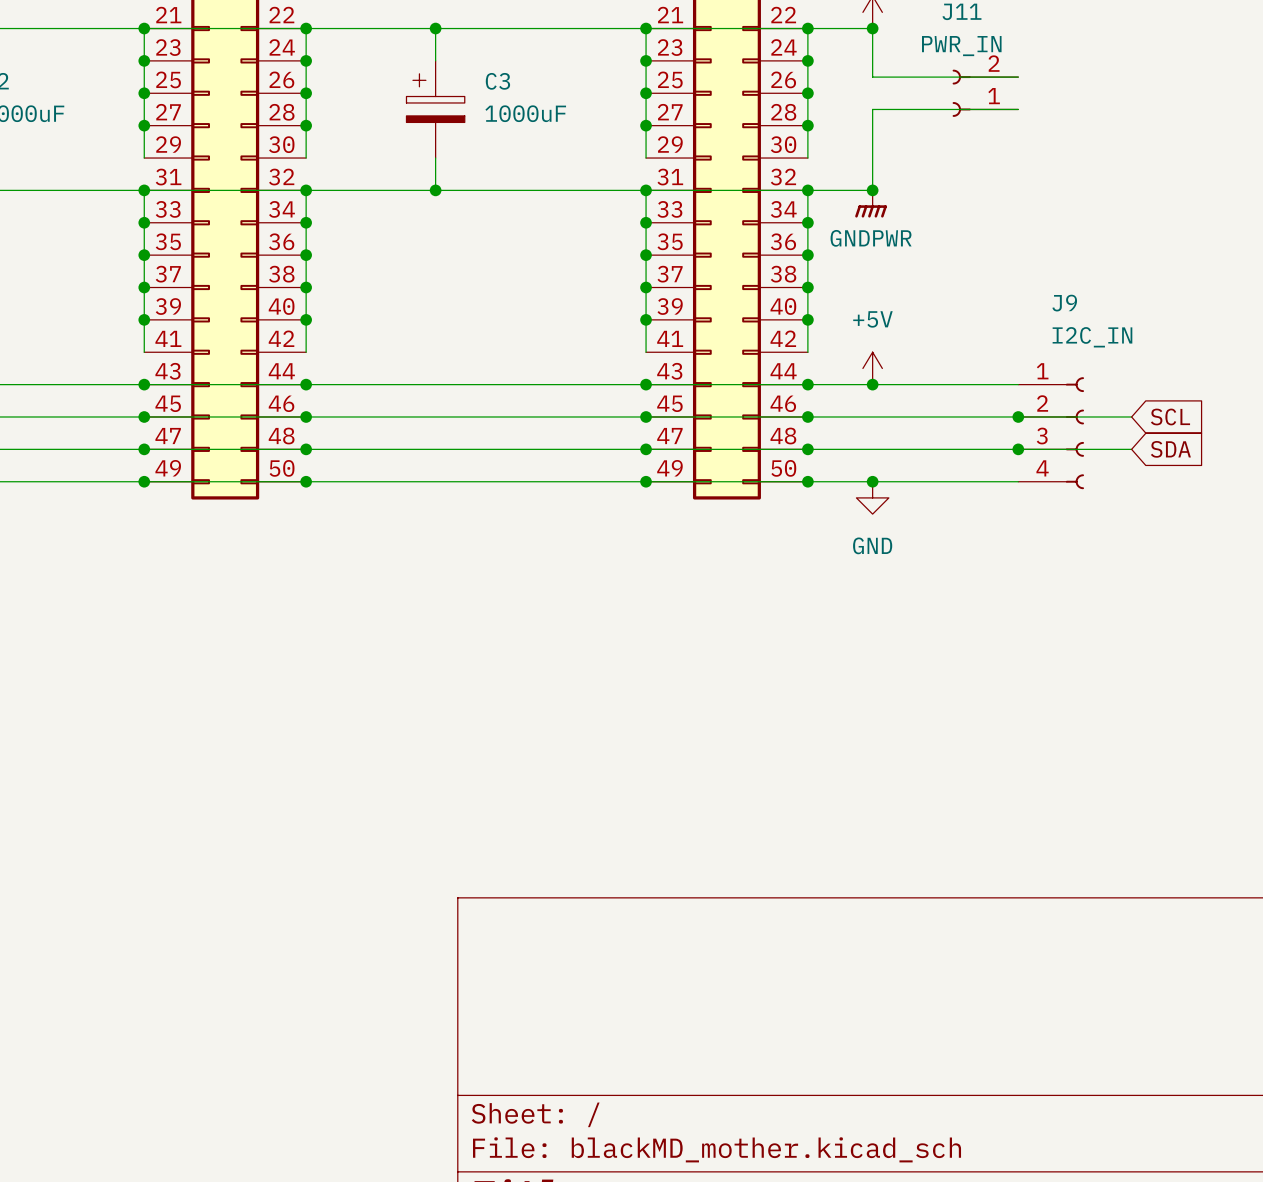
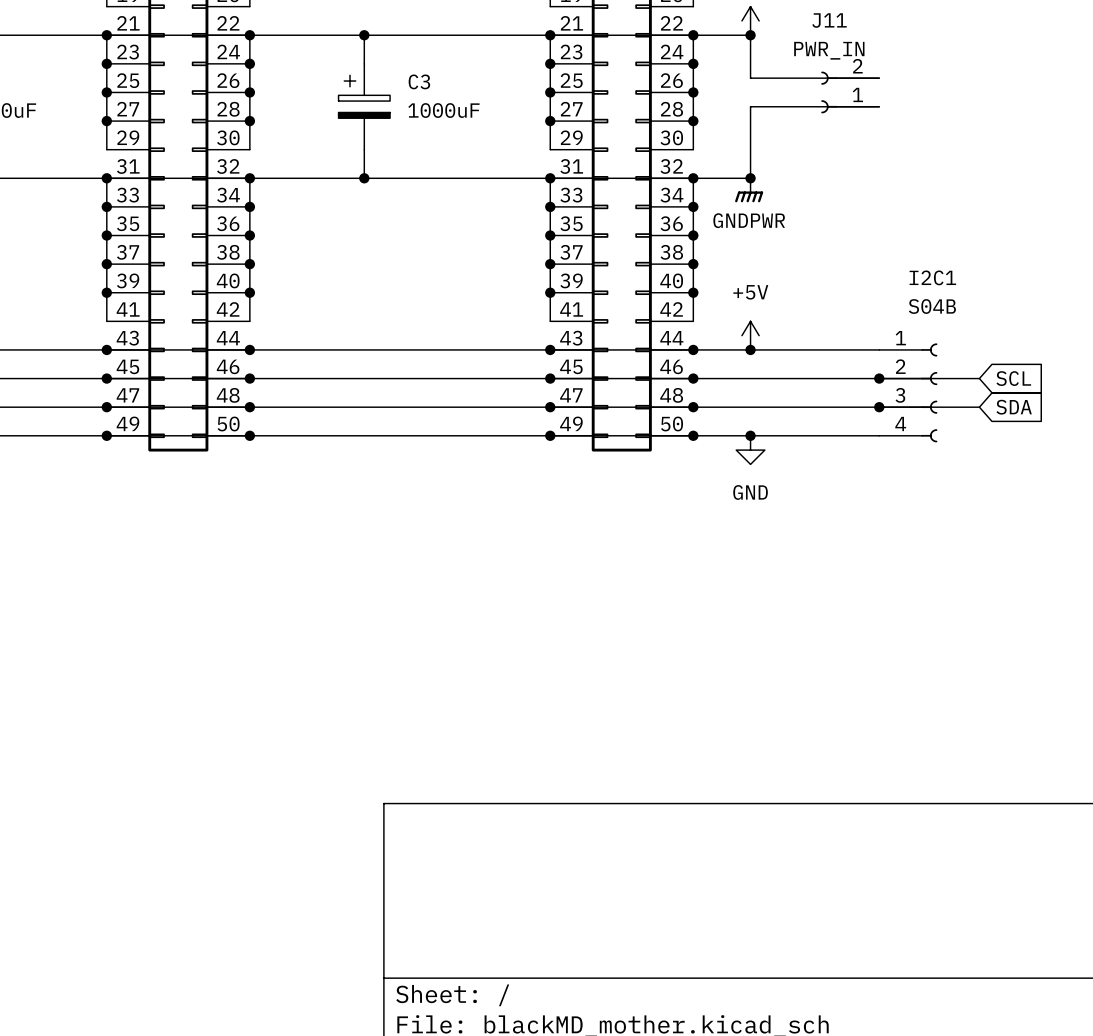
J9 name: J9 (1064, 303) -> I2C1 (932, 277)
J9 value: I2C_IN (1092, 337) -> S04B (932, 306)

